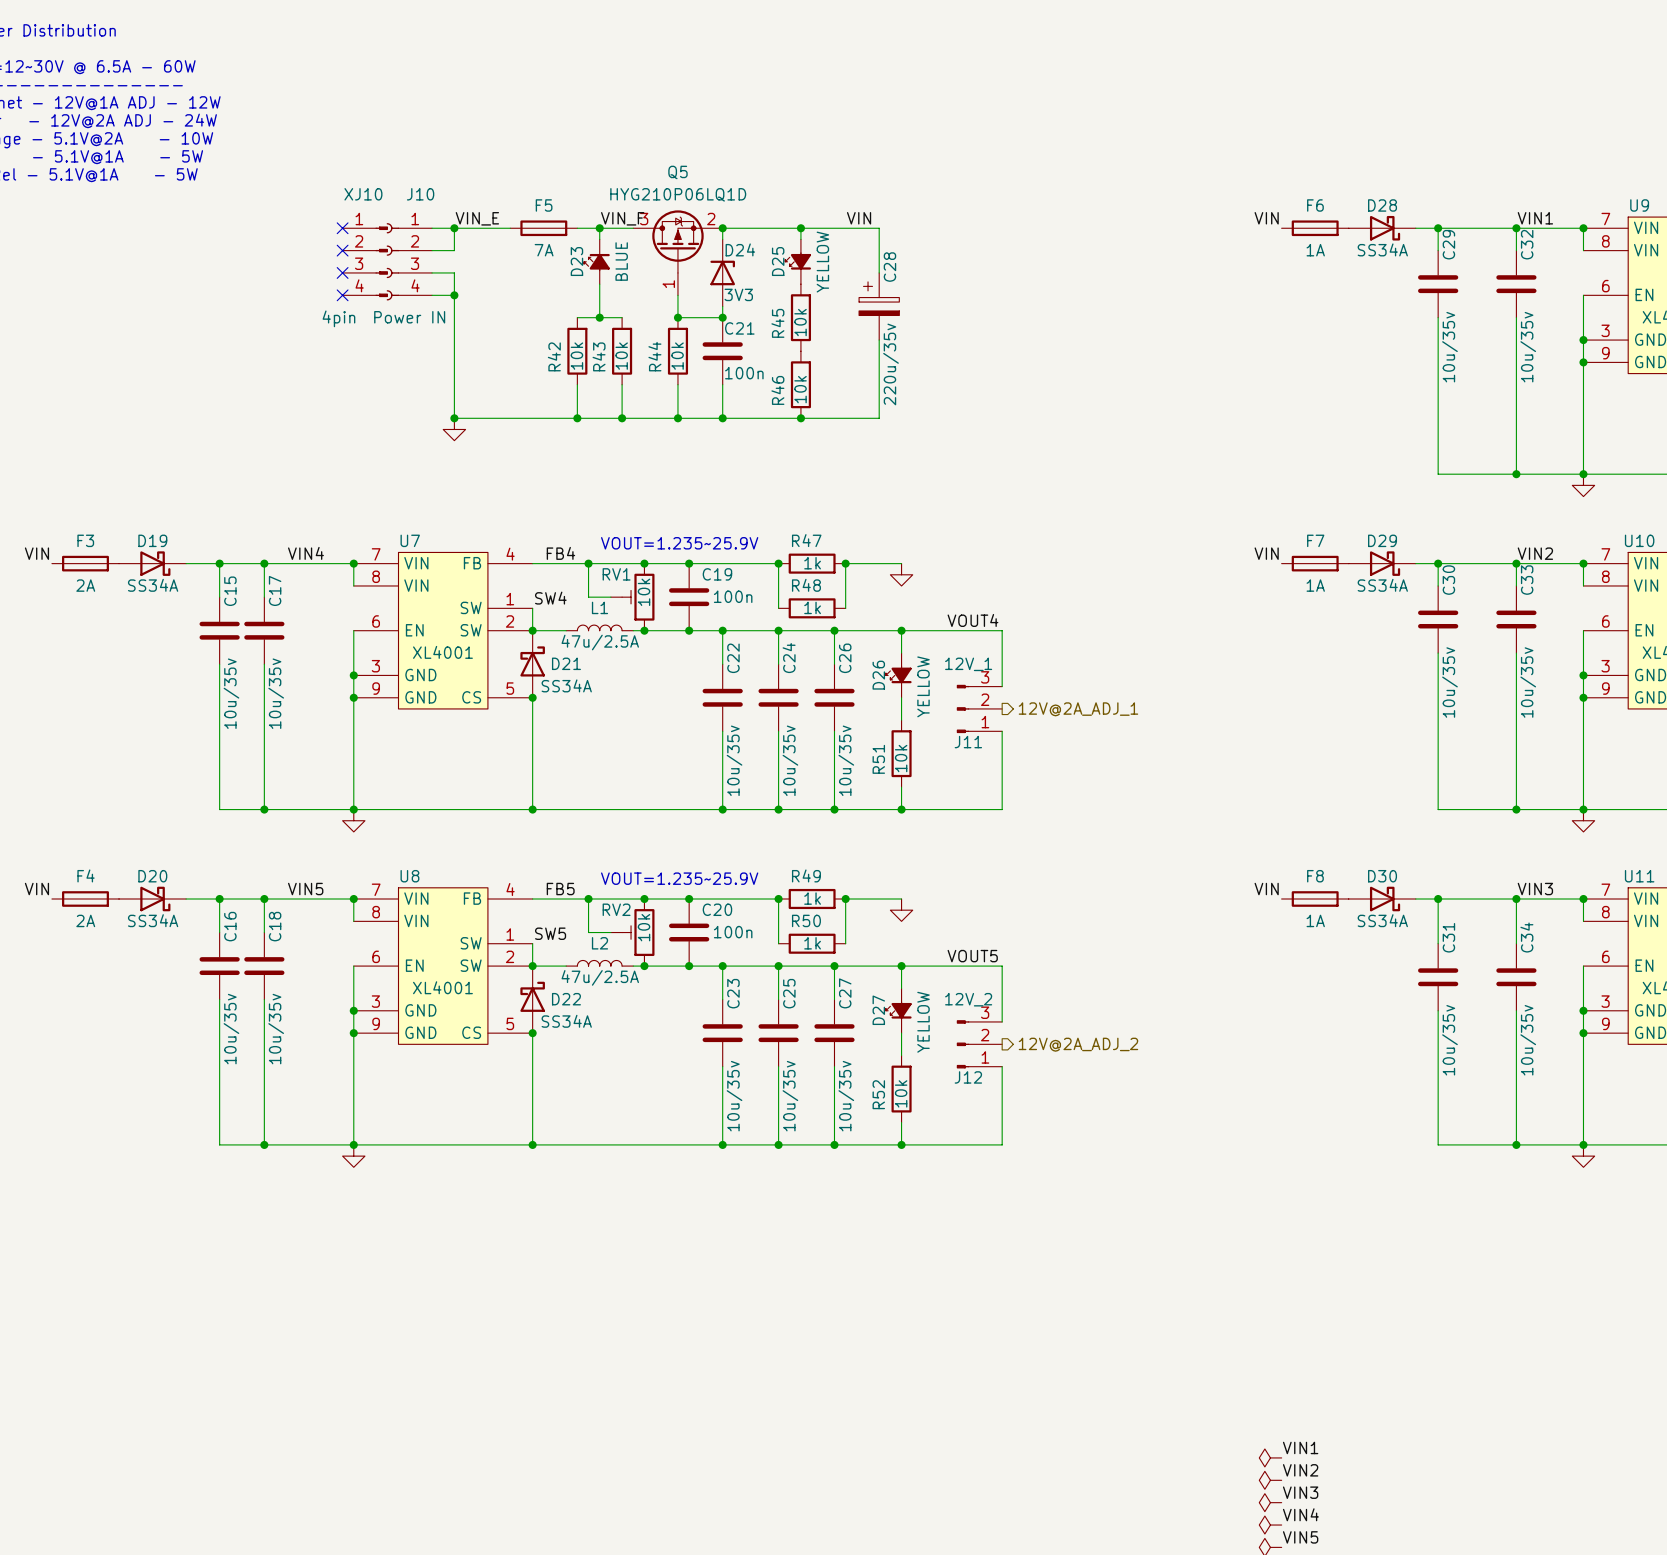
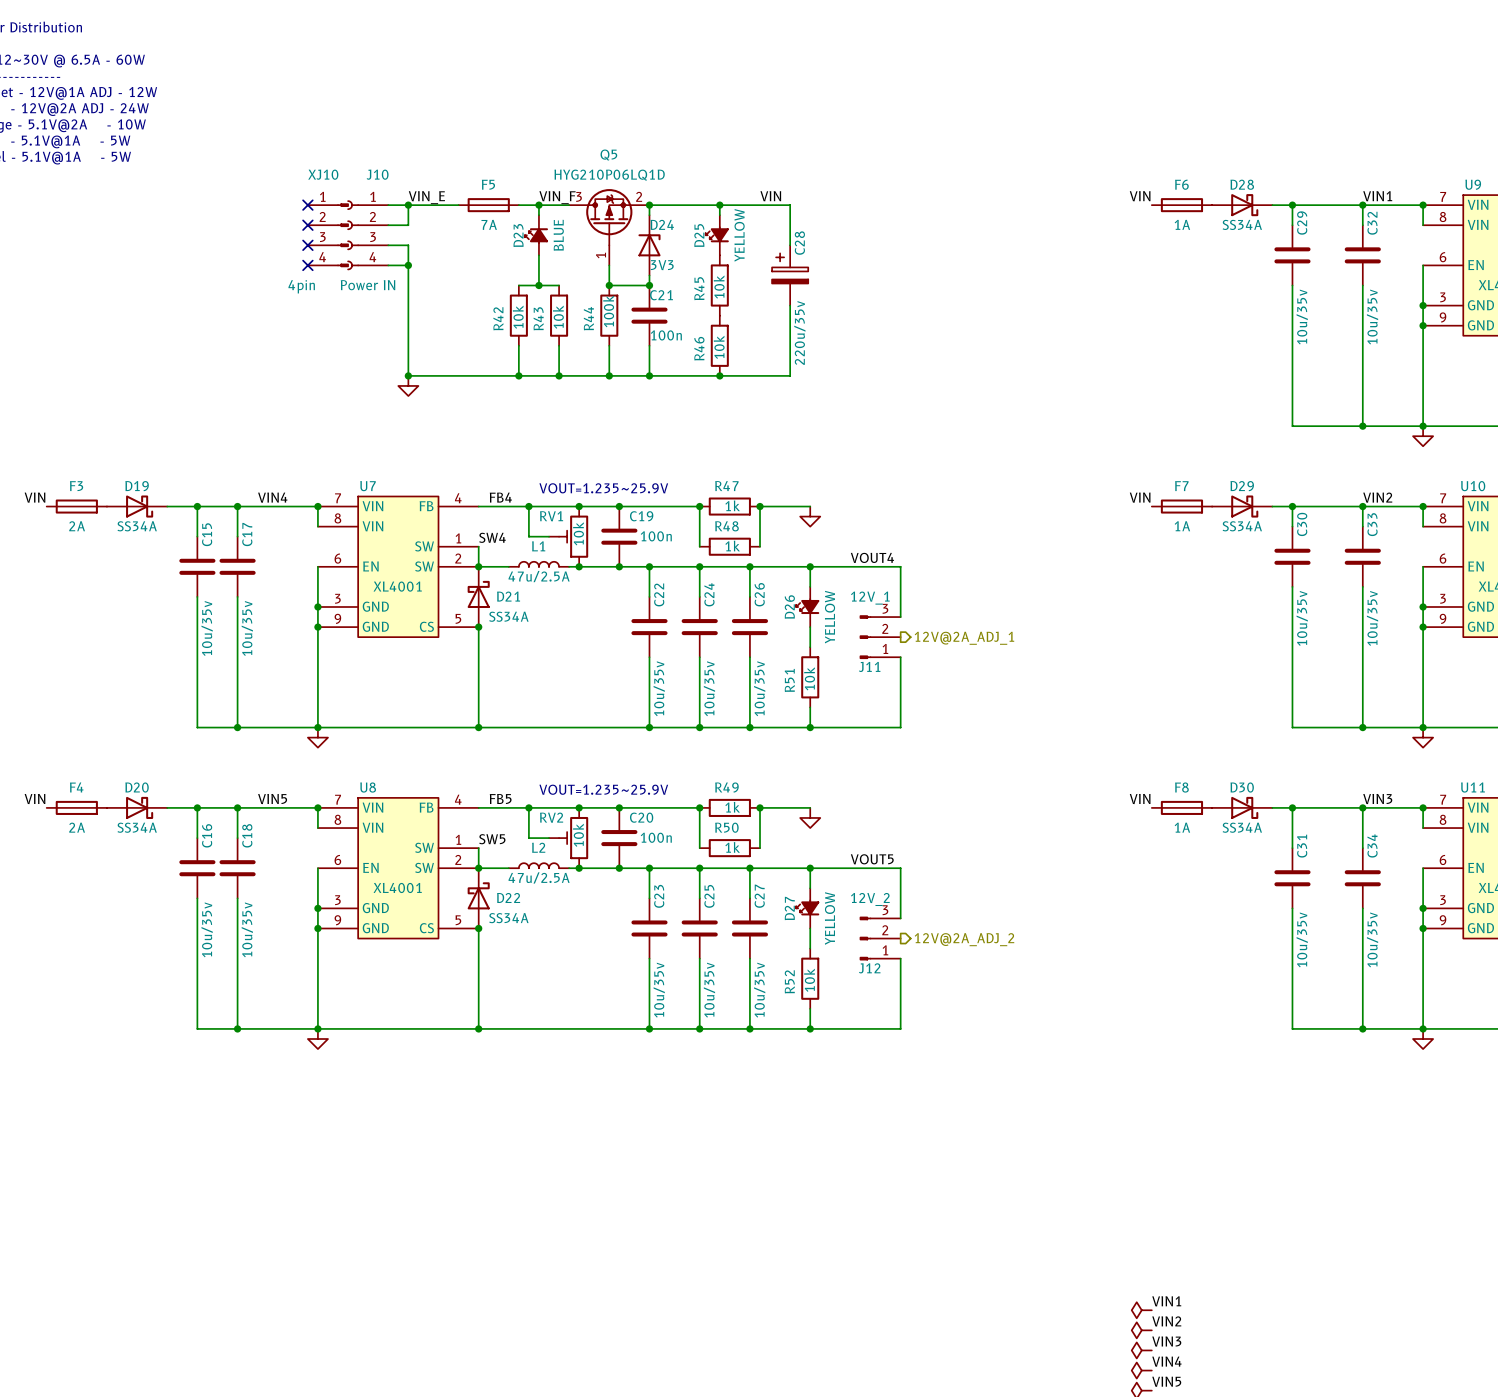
R44 value: 10k (677, 356) -> 100k (608, 311)

